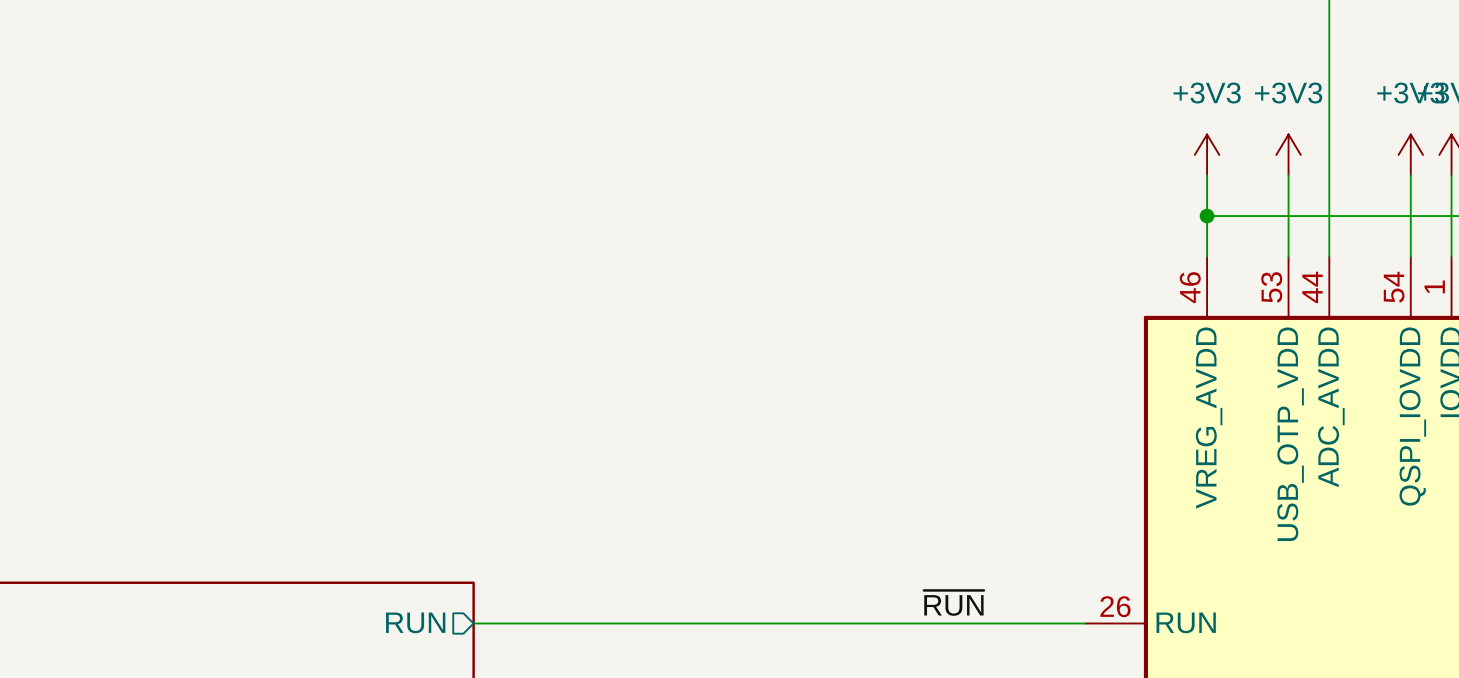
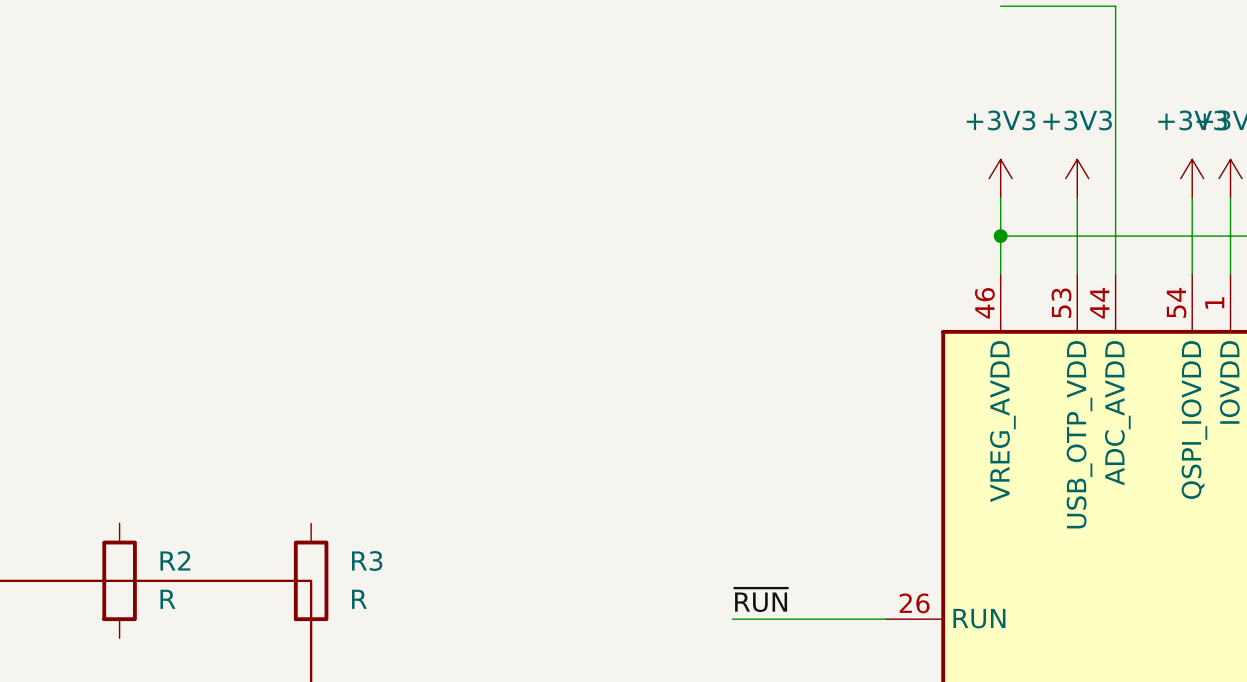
R2: none -> R (119, 580)
R3: none -> R (311, 580)
sheet pin: RUN (415, 622) -> none
wire: (473, 623) (921, 623) -> none

